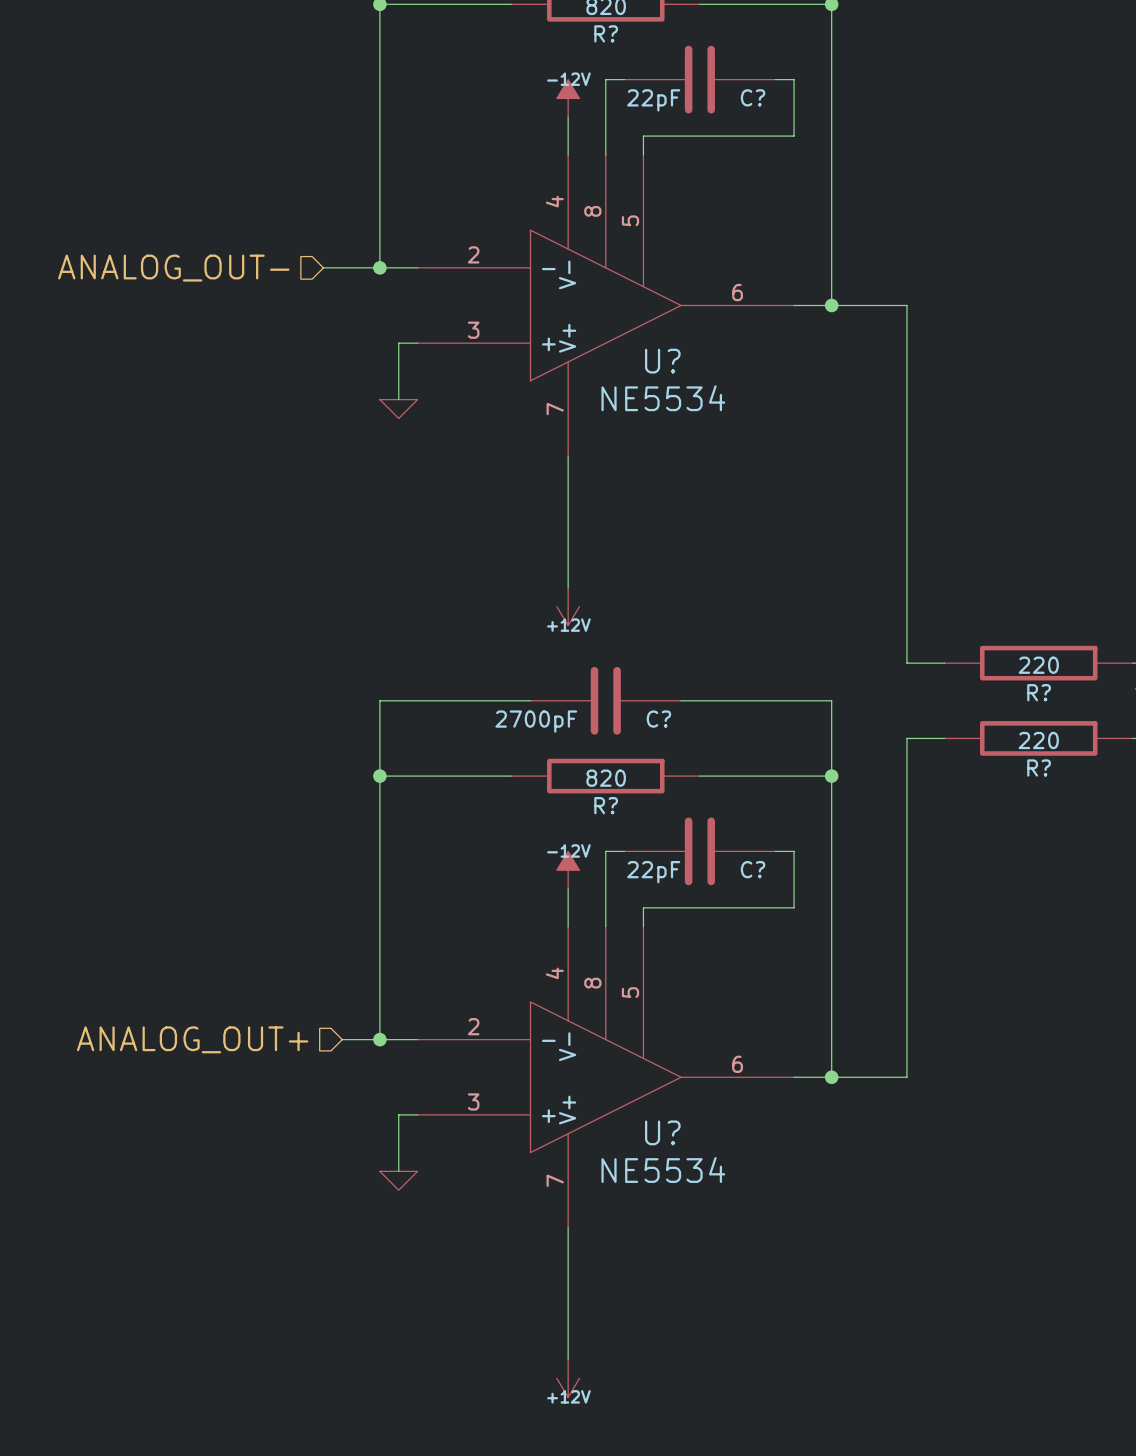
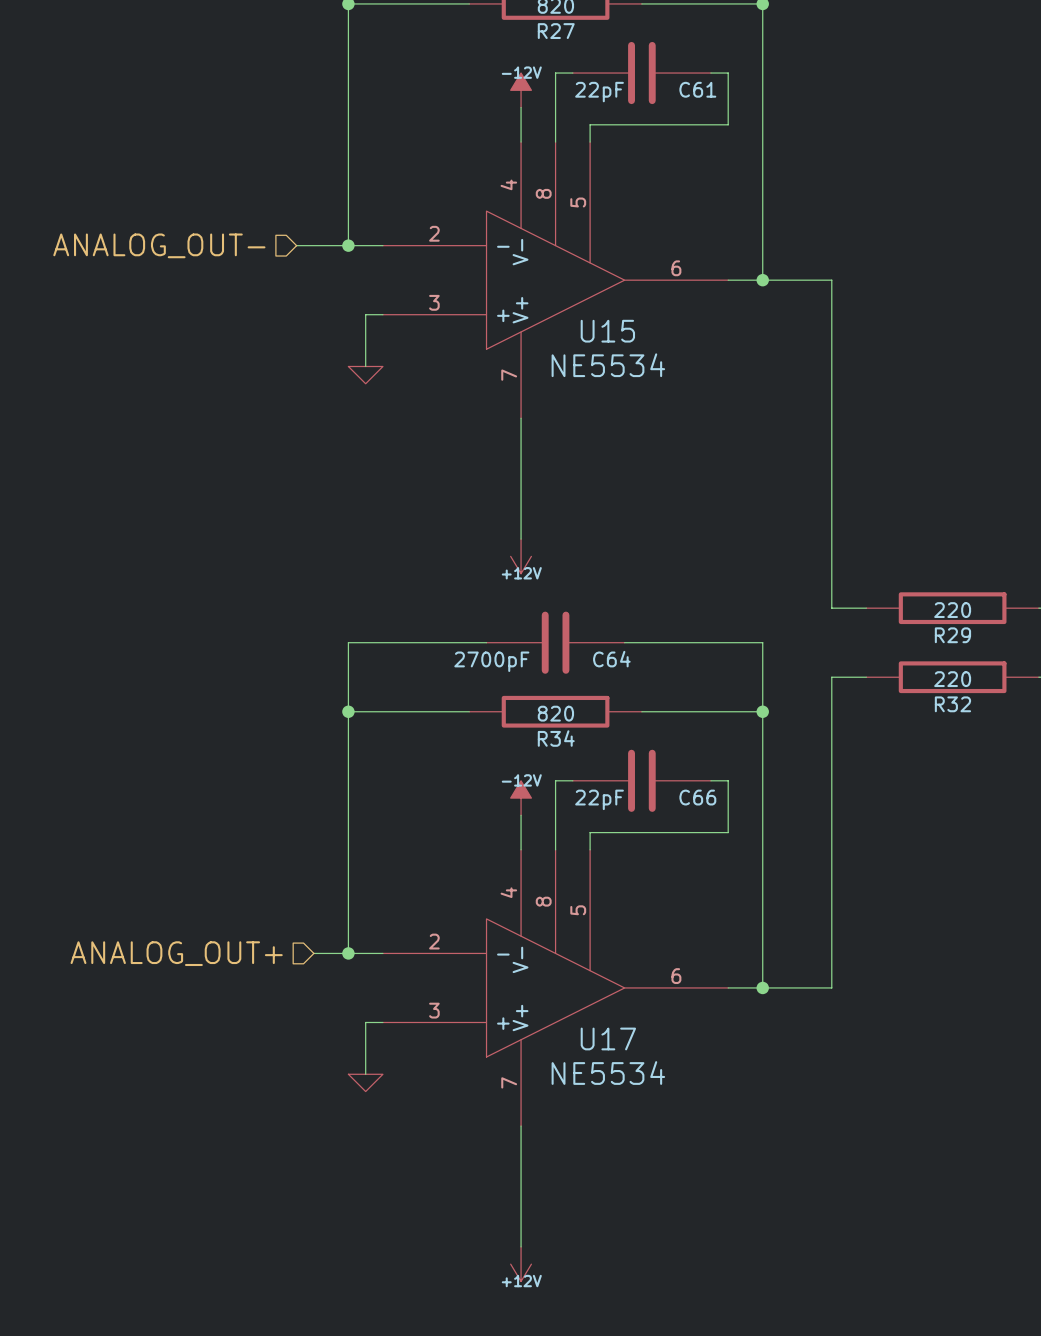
R? name: R? (606, 33) -> R27 (556, 31)
C? name: C? (753, 97) -> C61 (697, 89)
U? name: U? (662, 361) -> U15 (607, 331)
R? name: R? (1039, 692) -> R29 (952, 635)
C? name: C? (658, 719) -> C64 (611, 659)
R? name: R? (1039, 768) -> R32 (952, 704)
R? name: R? (606, 805) -> R34 (556, 738)
C? name: C? (753, 869) -> C66 (697, 797)
U? name: U? (662, 1132) -> U17 (608, 1038)

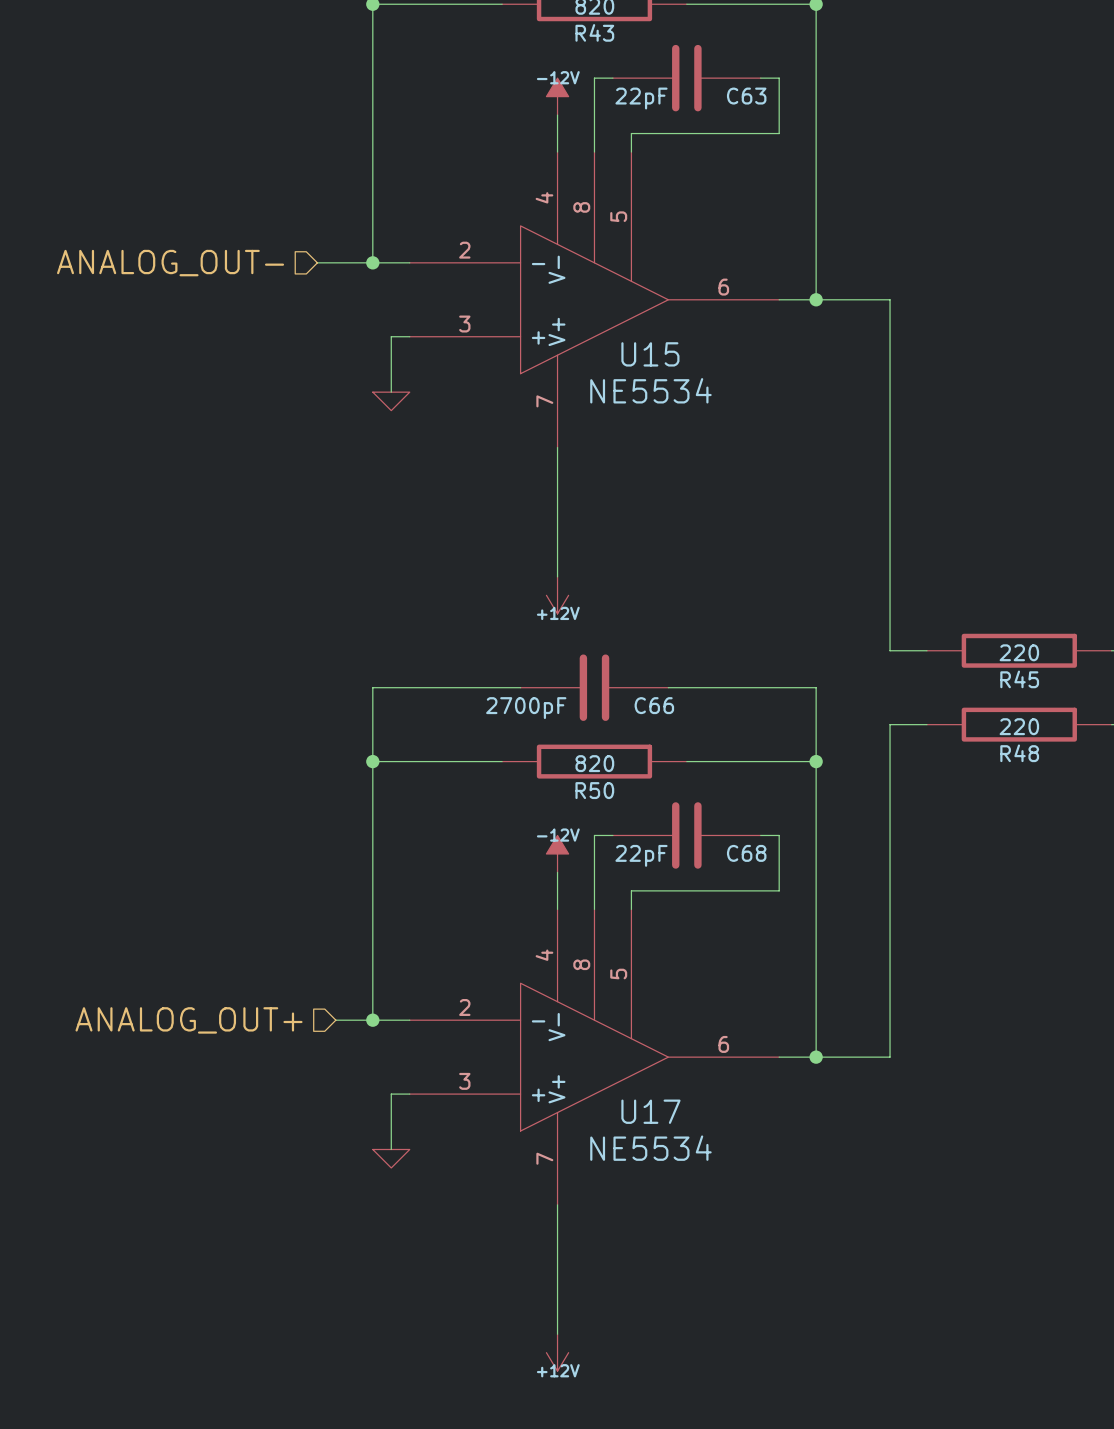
R27 name: R27 (556, 31) -> R43 (594, 32)
C61 name: C61 (697, 89) -> C63 (746, 96)
R29 name: R29 (952, 635) -> R45 (1019, 679)
C64 name: C64 (611, 659) -> C66 (654, 705)
R32 name: R32 (952, 704) -> R48 (1019, 753)
R34 name: R34 (556, 738) -> R50 (594, 790)
C66 name: C66 (697, 797) -> C68 (746, 853)

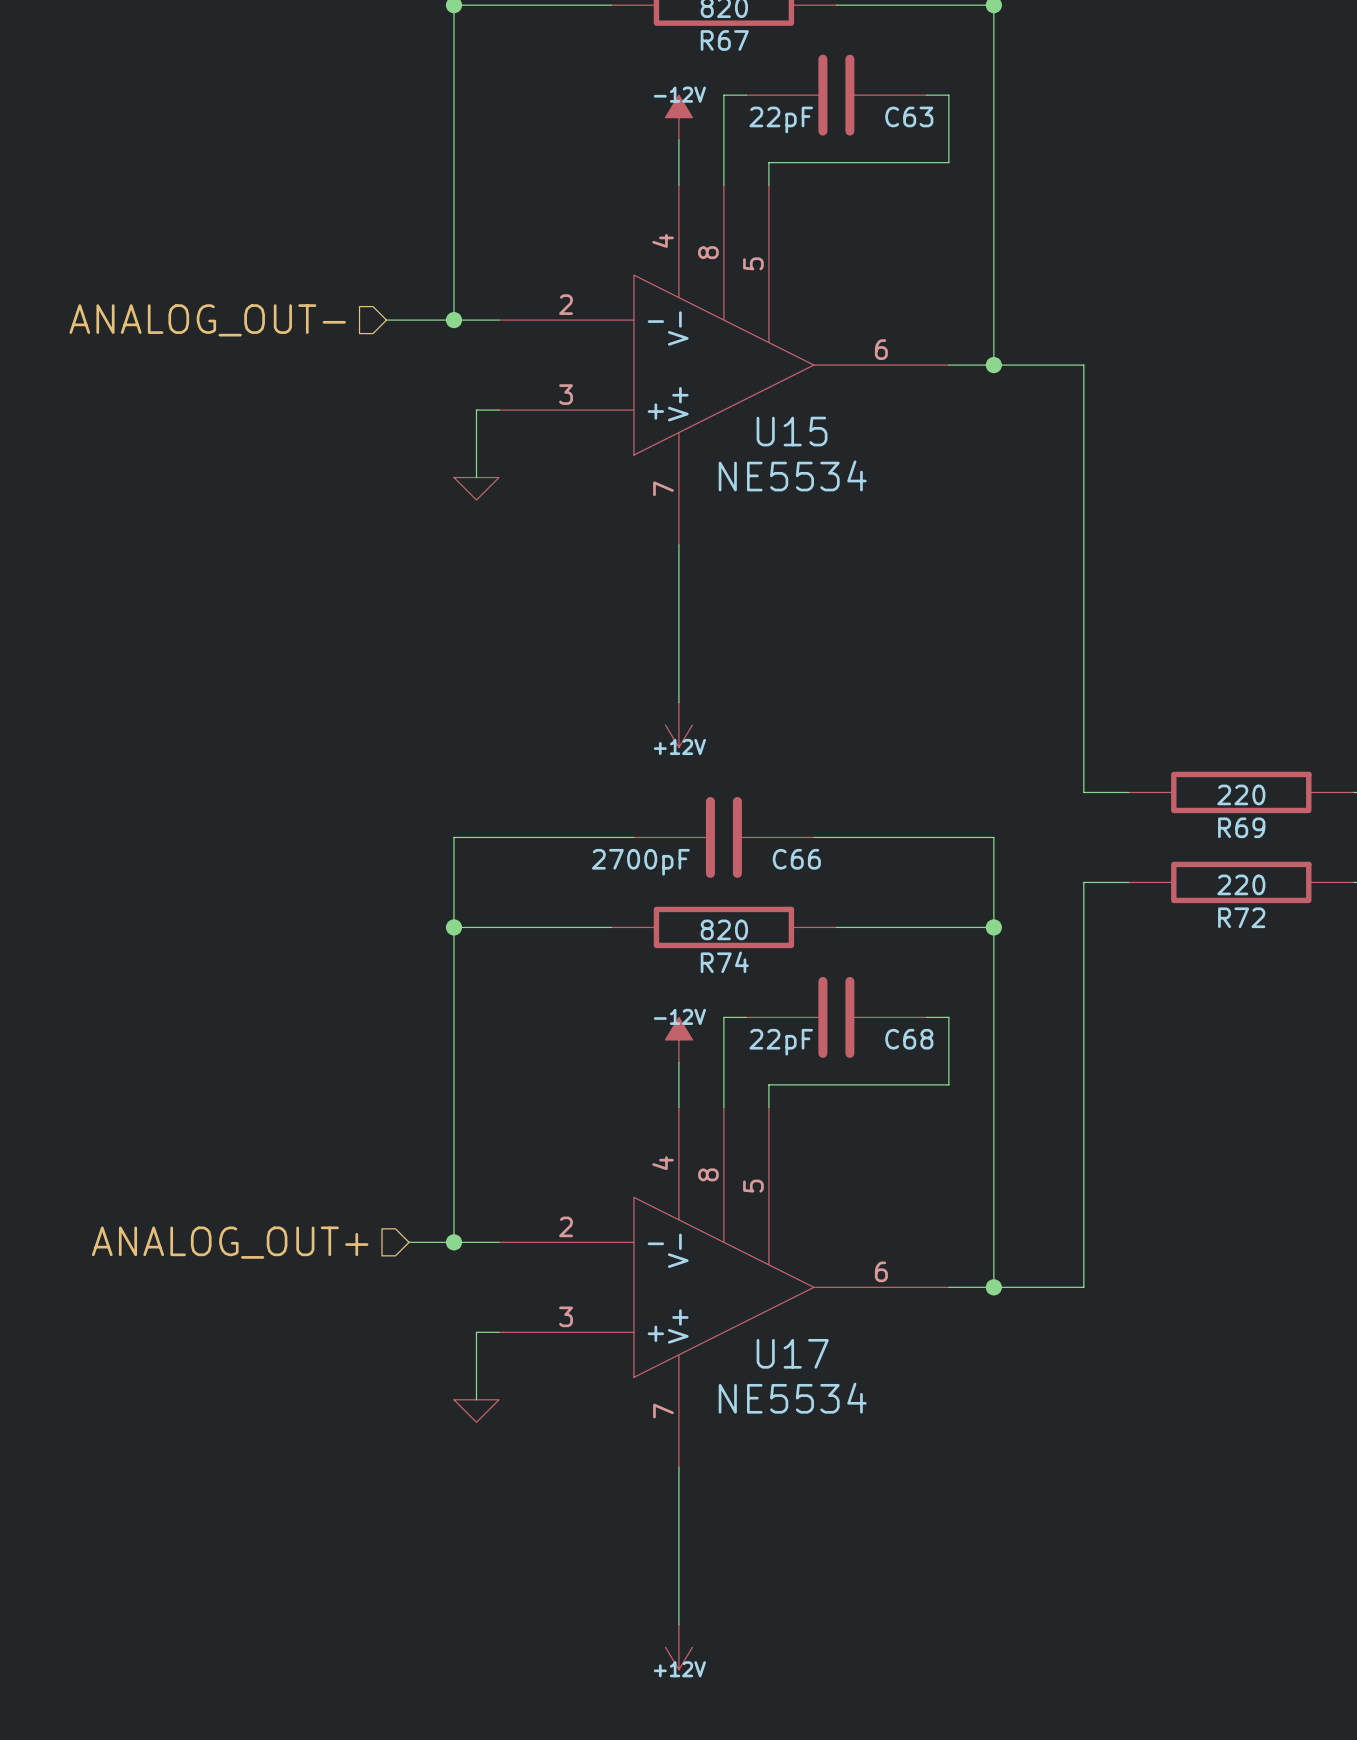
R43 name: R43 (594, 32) -> R67 (724, 40)
R45 name: R45 (1019, 679) -> R69 (1241, 827)
R48 name: R48 (1019, 753) -> R72 (1241, 917)
R50 name: R50 (594, 790) -> R74 (724, 962)

